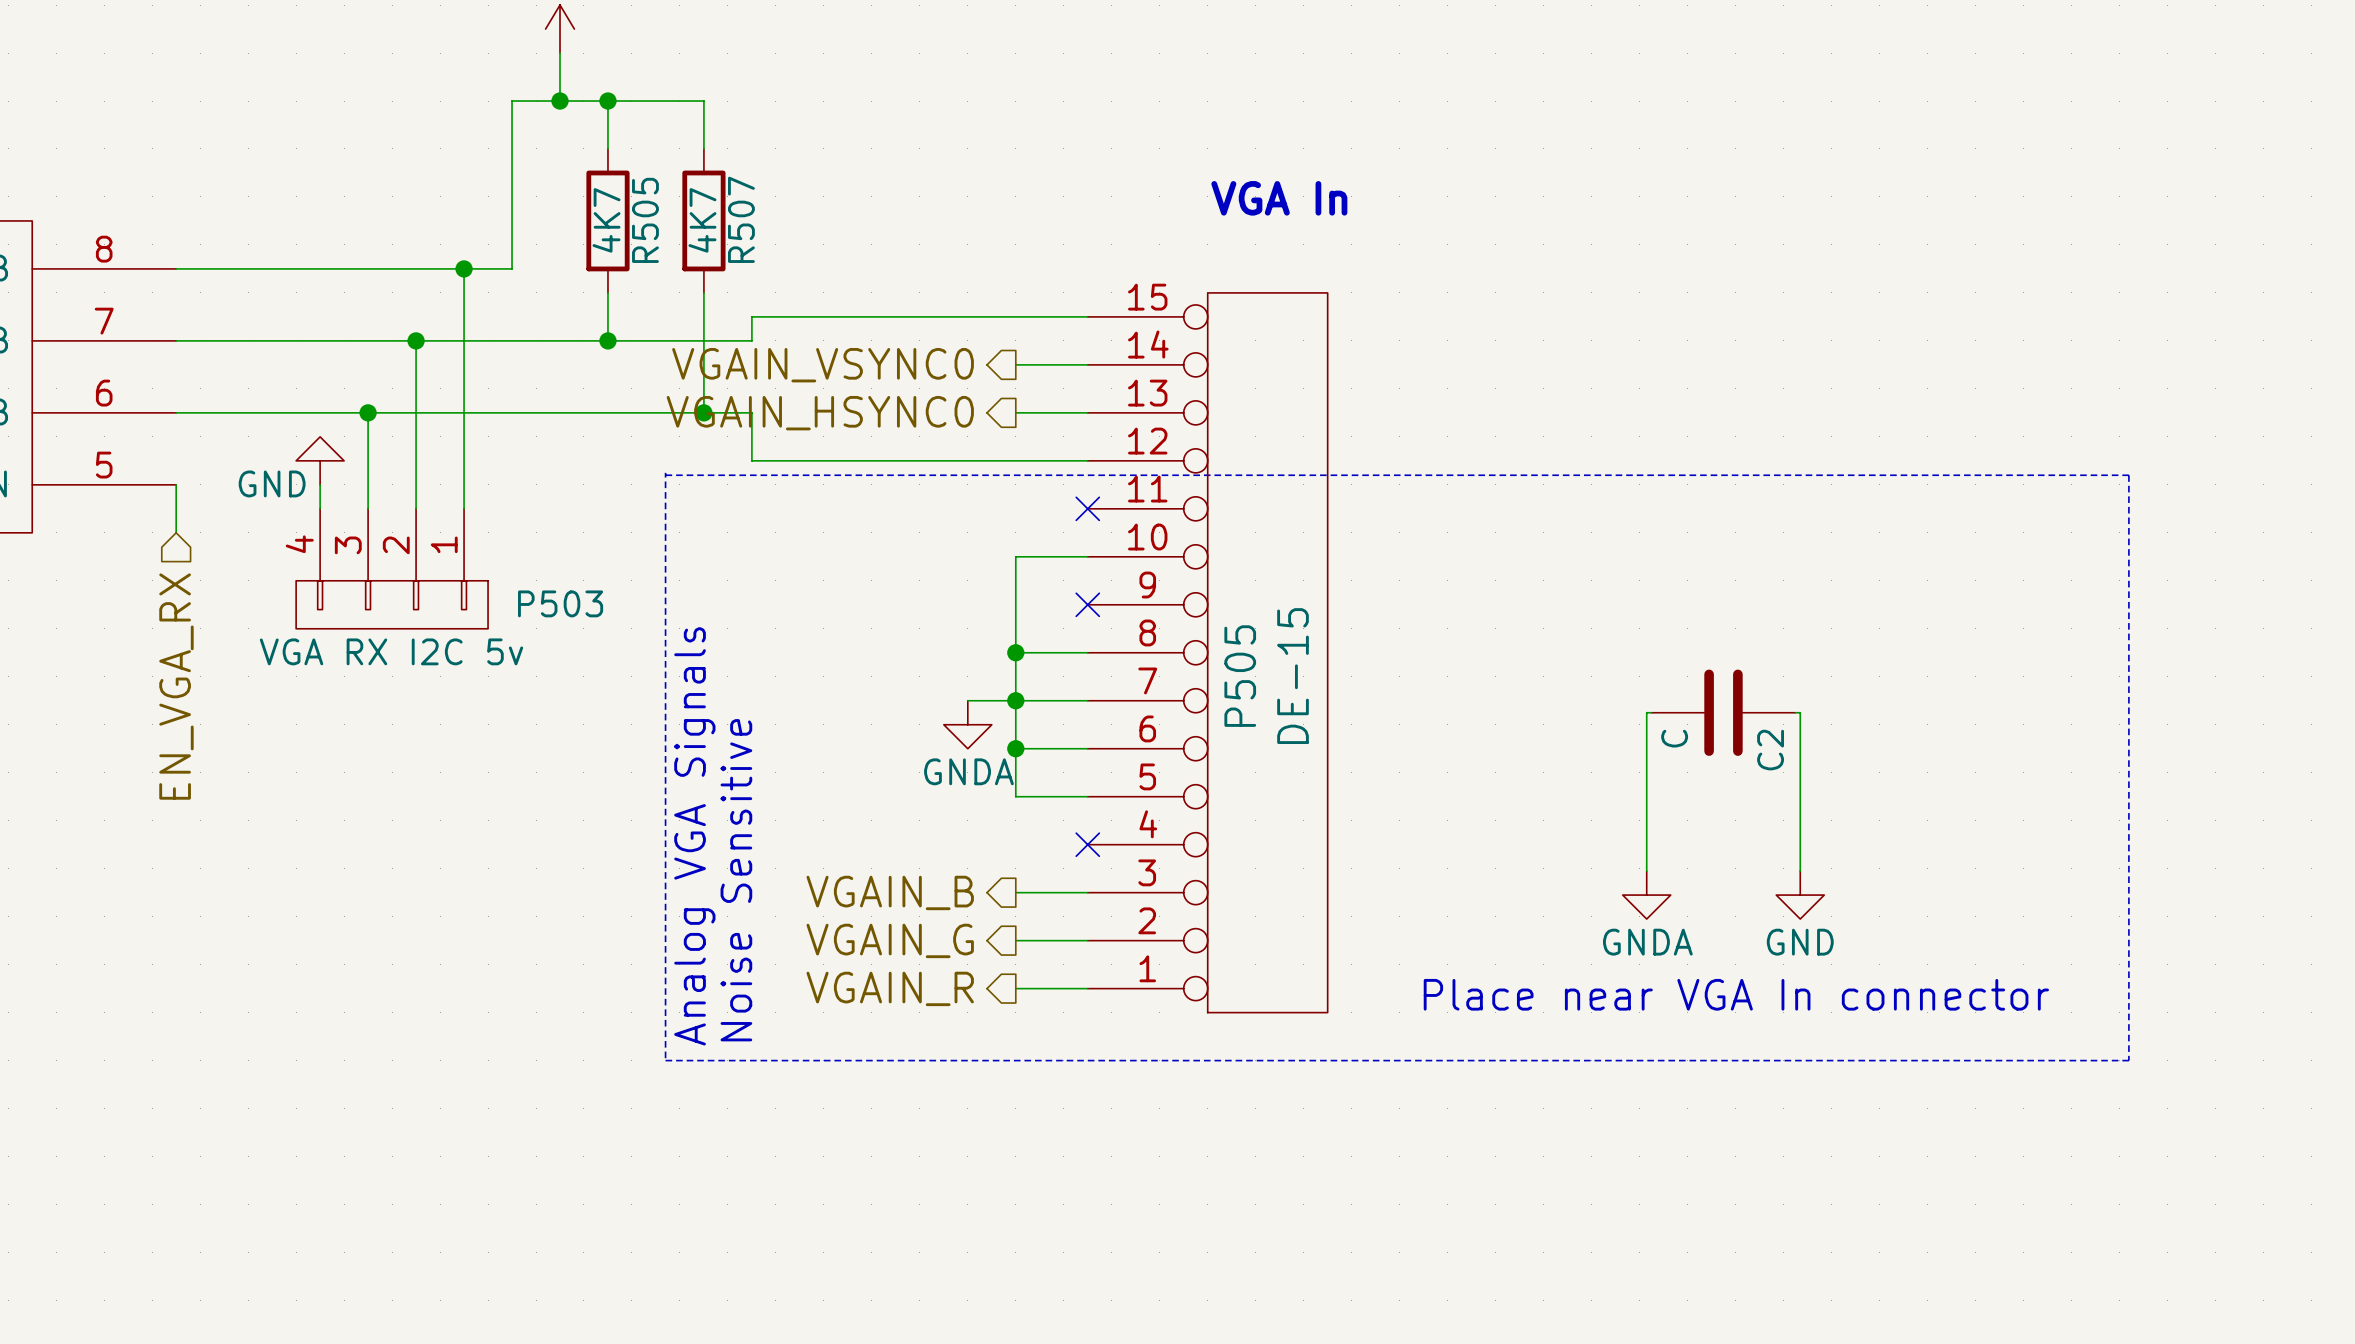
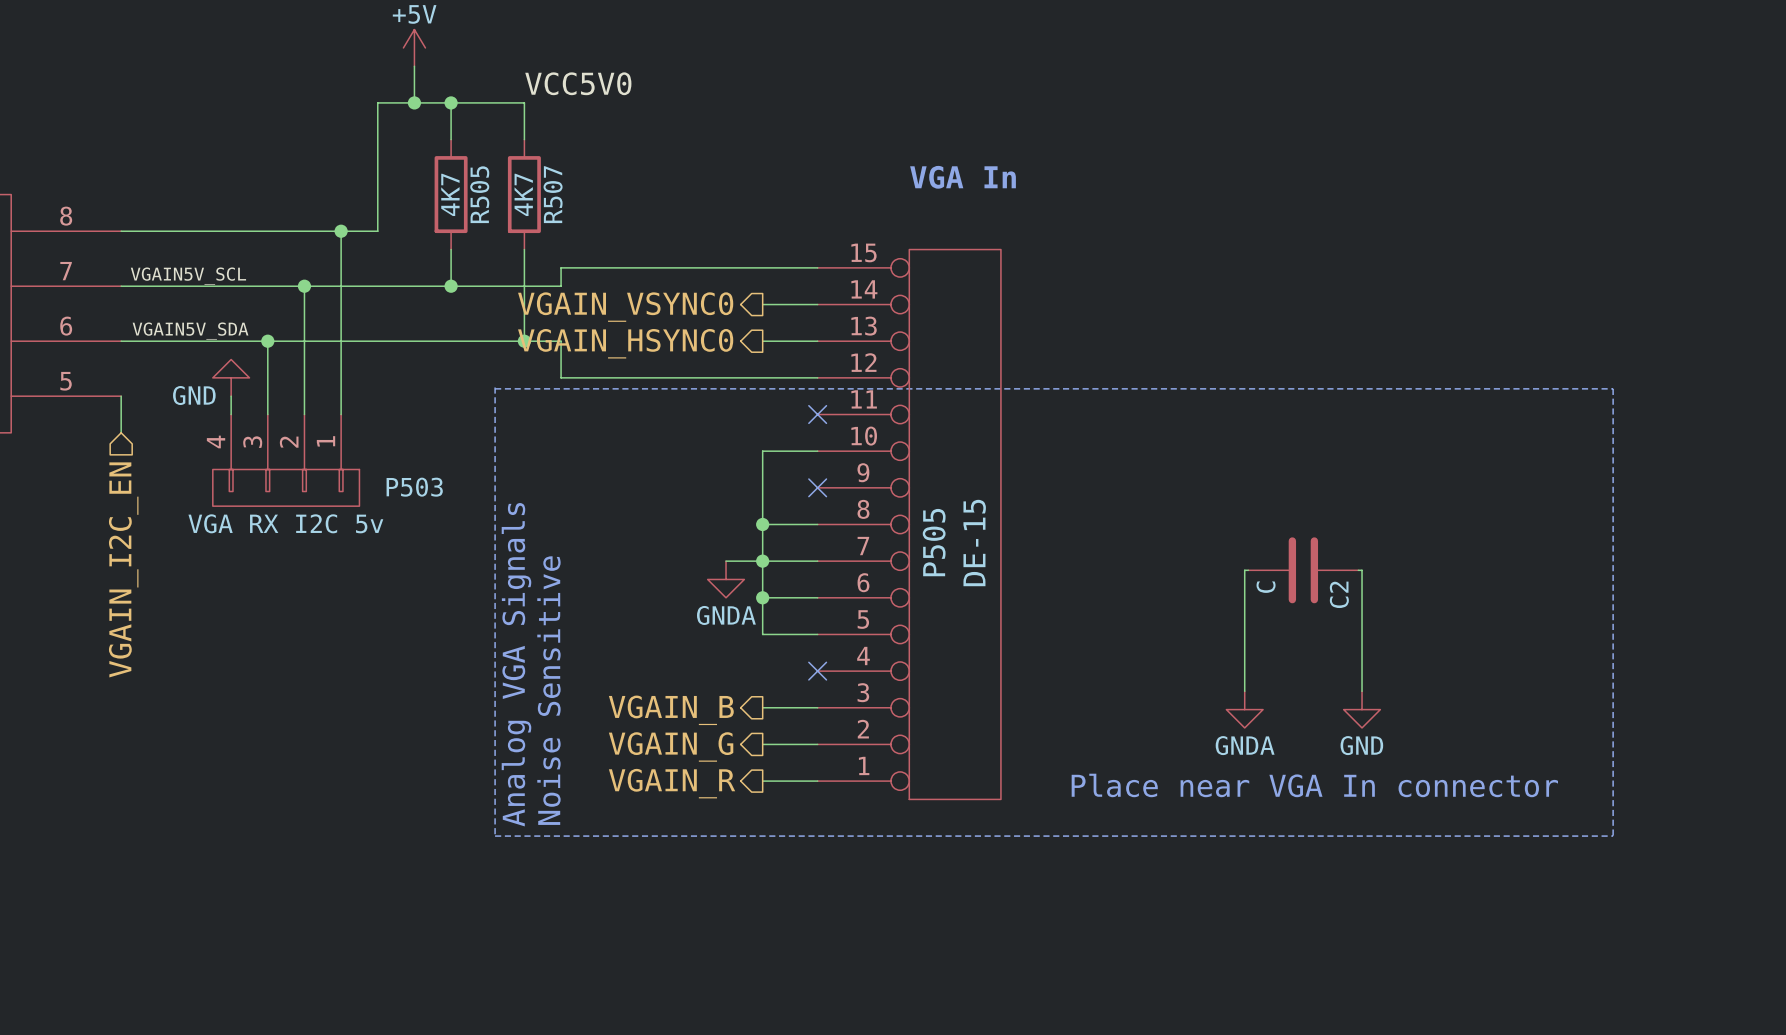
label: none -> VCC5V0 (578, 83)
label: none -> VGAIN5V_SCL (188, 276)
label: none -> VGAIN5V_SDA (190, 331)
hierarchical label: EN_VGA_RX (176, 686) -> VGAIN_I2C_EN (123, 569)

